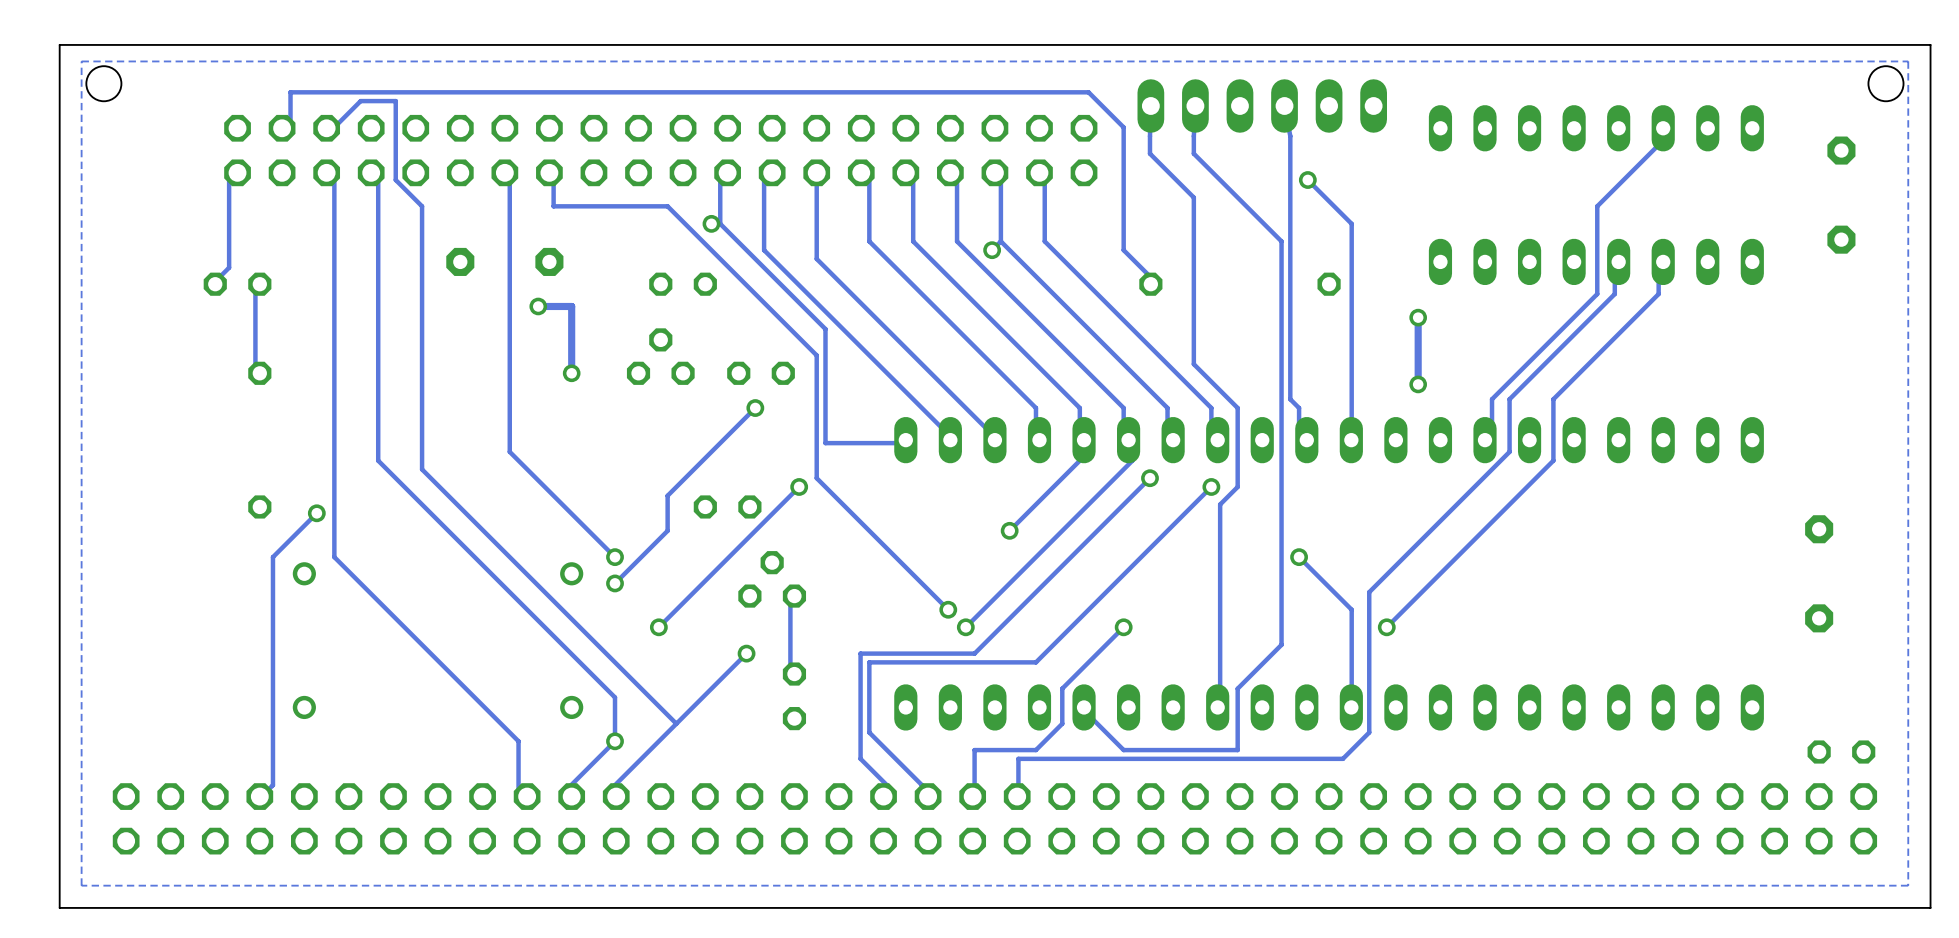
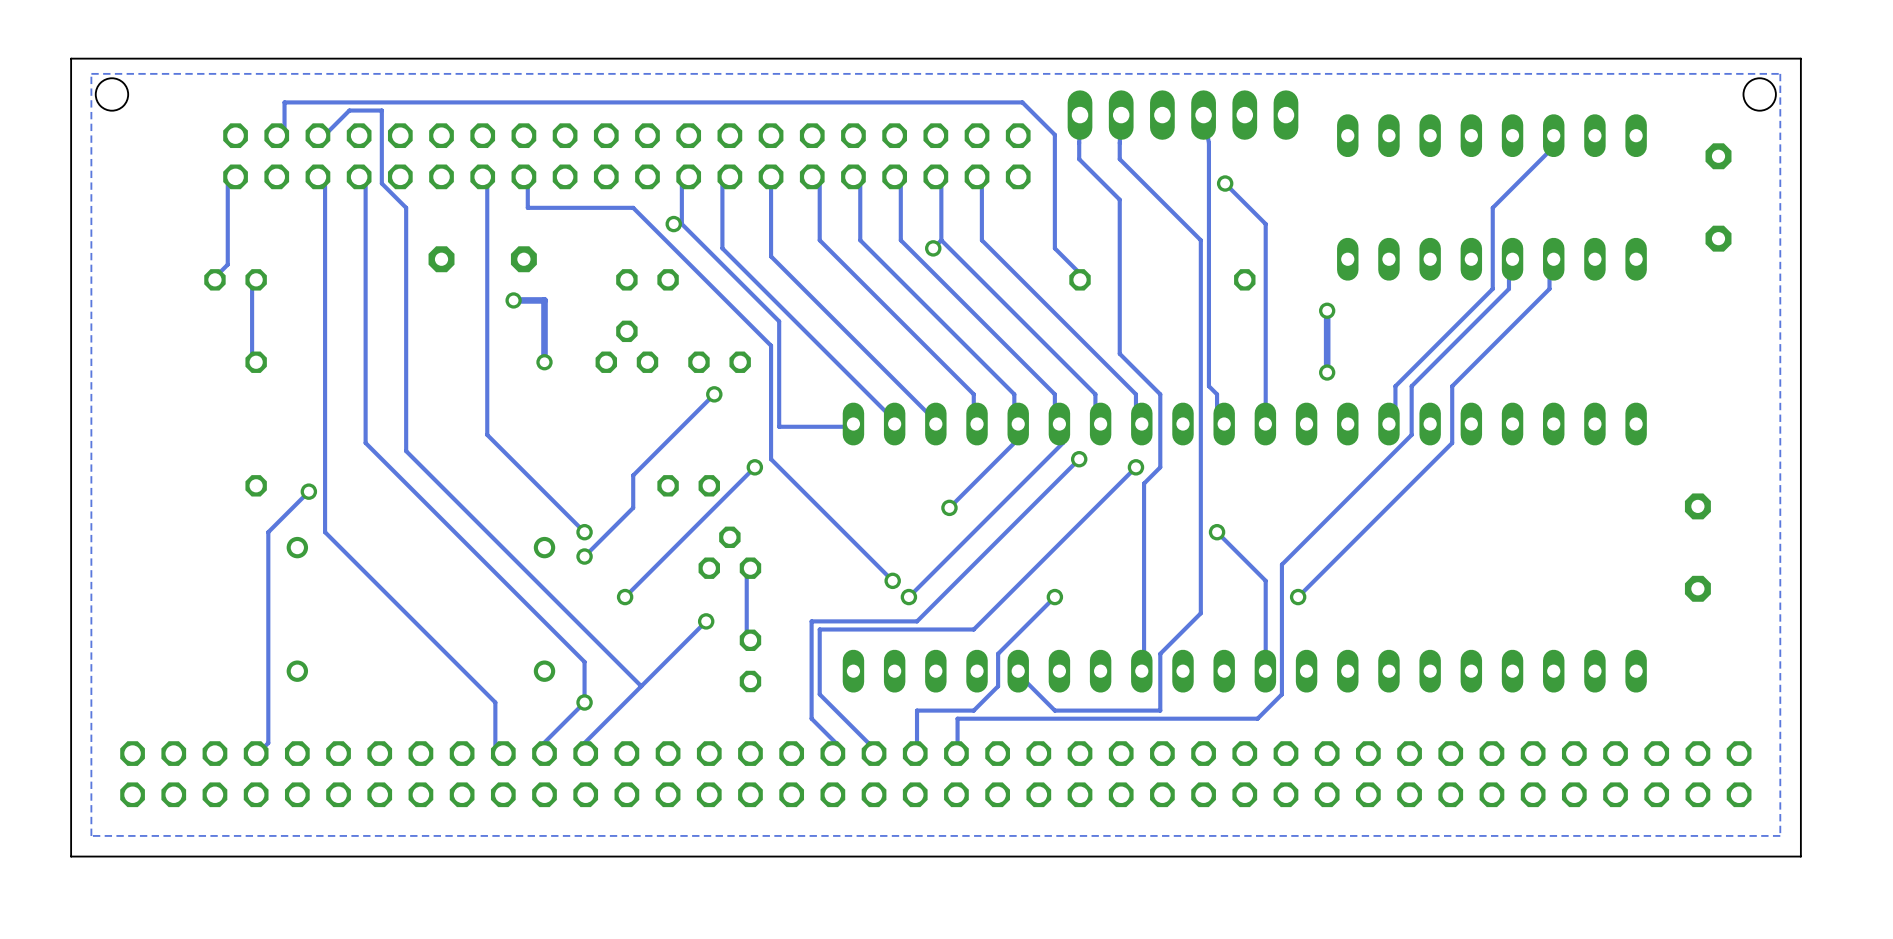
part: (1841, 752) -> none

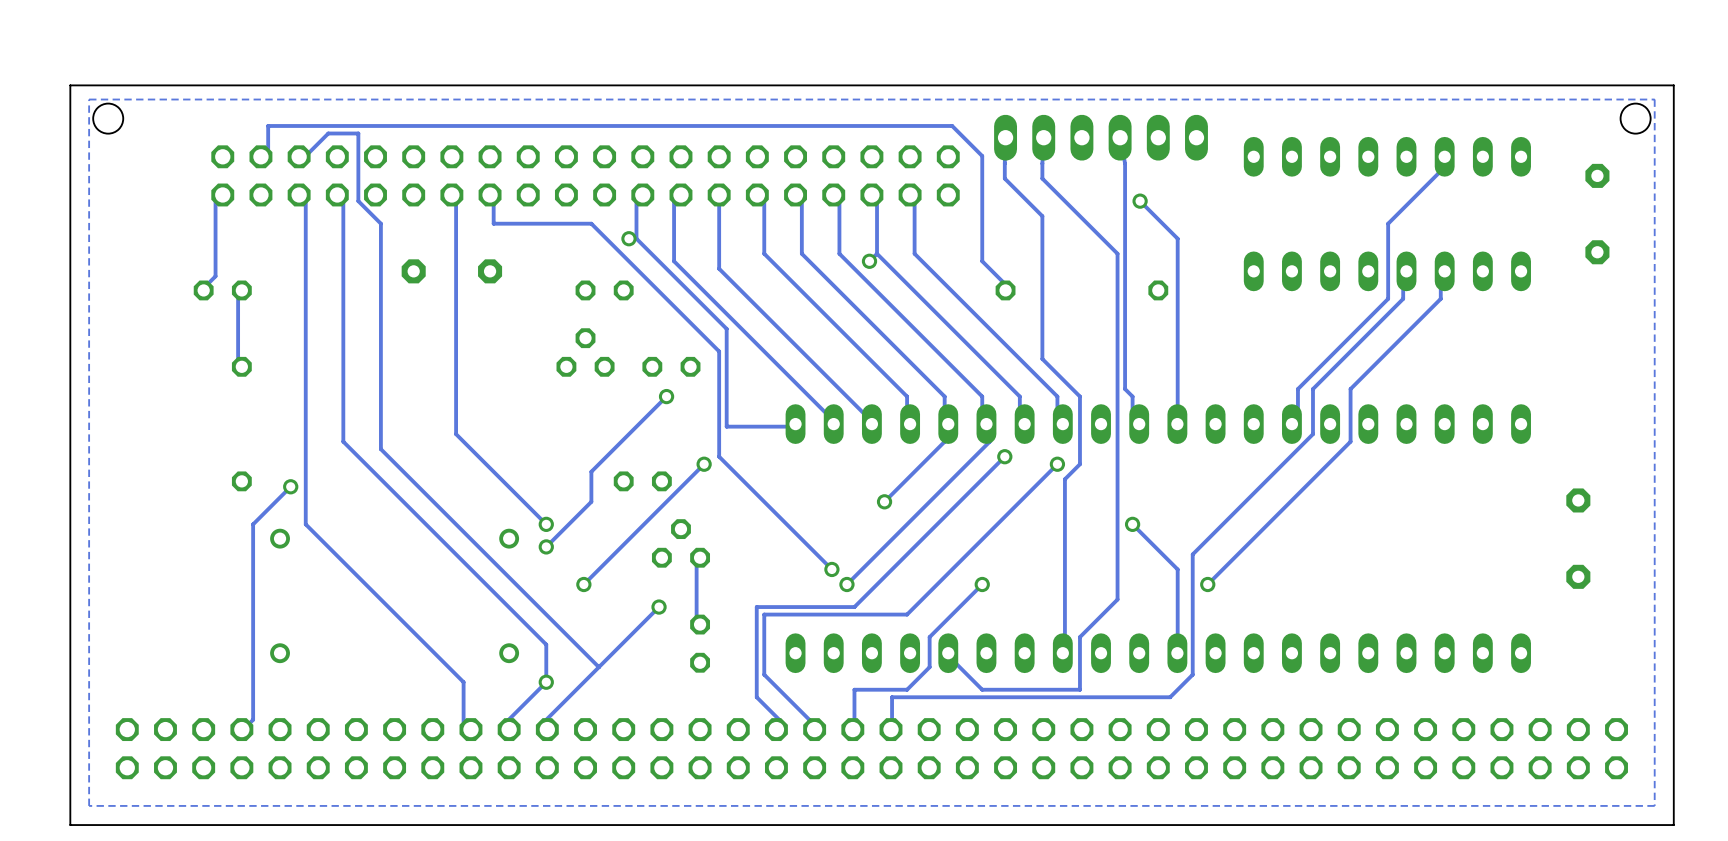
track: (513, 300) (544, 300) (544, 362) -> none
via: (513, 300) -> none
track: (1327, 310) (1327, 372) -> none
via: (1327, 310) -> none
via: (544, 362) -> none
via: (1327, 372) -> none

